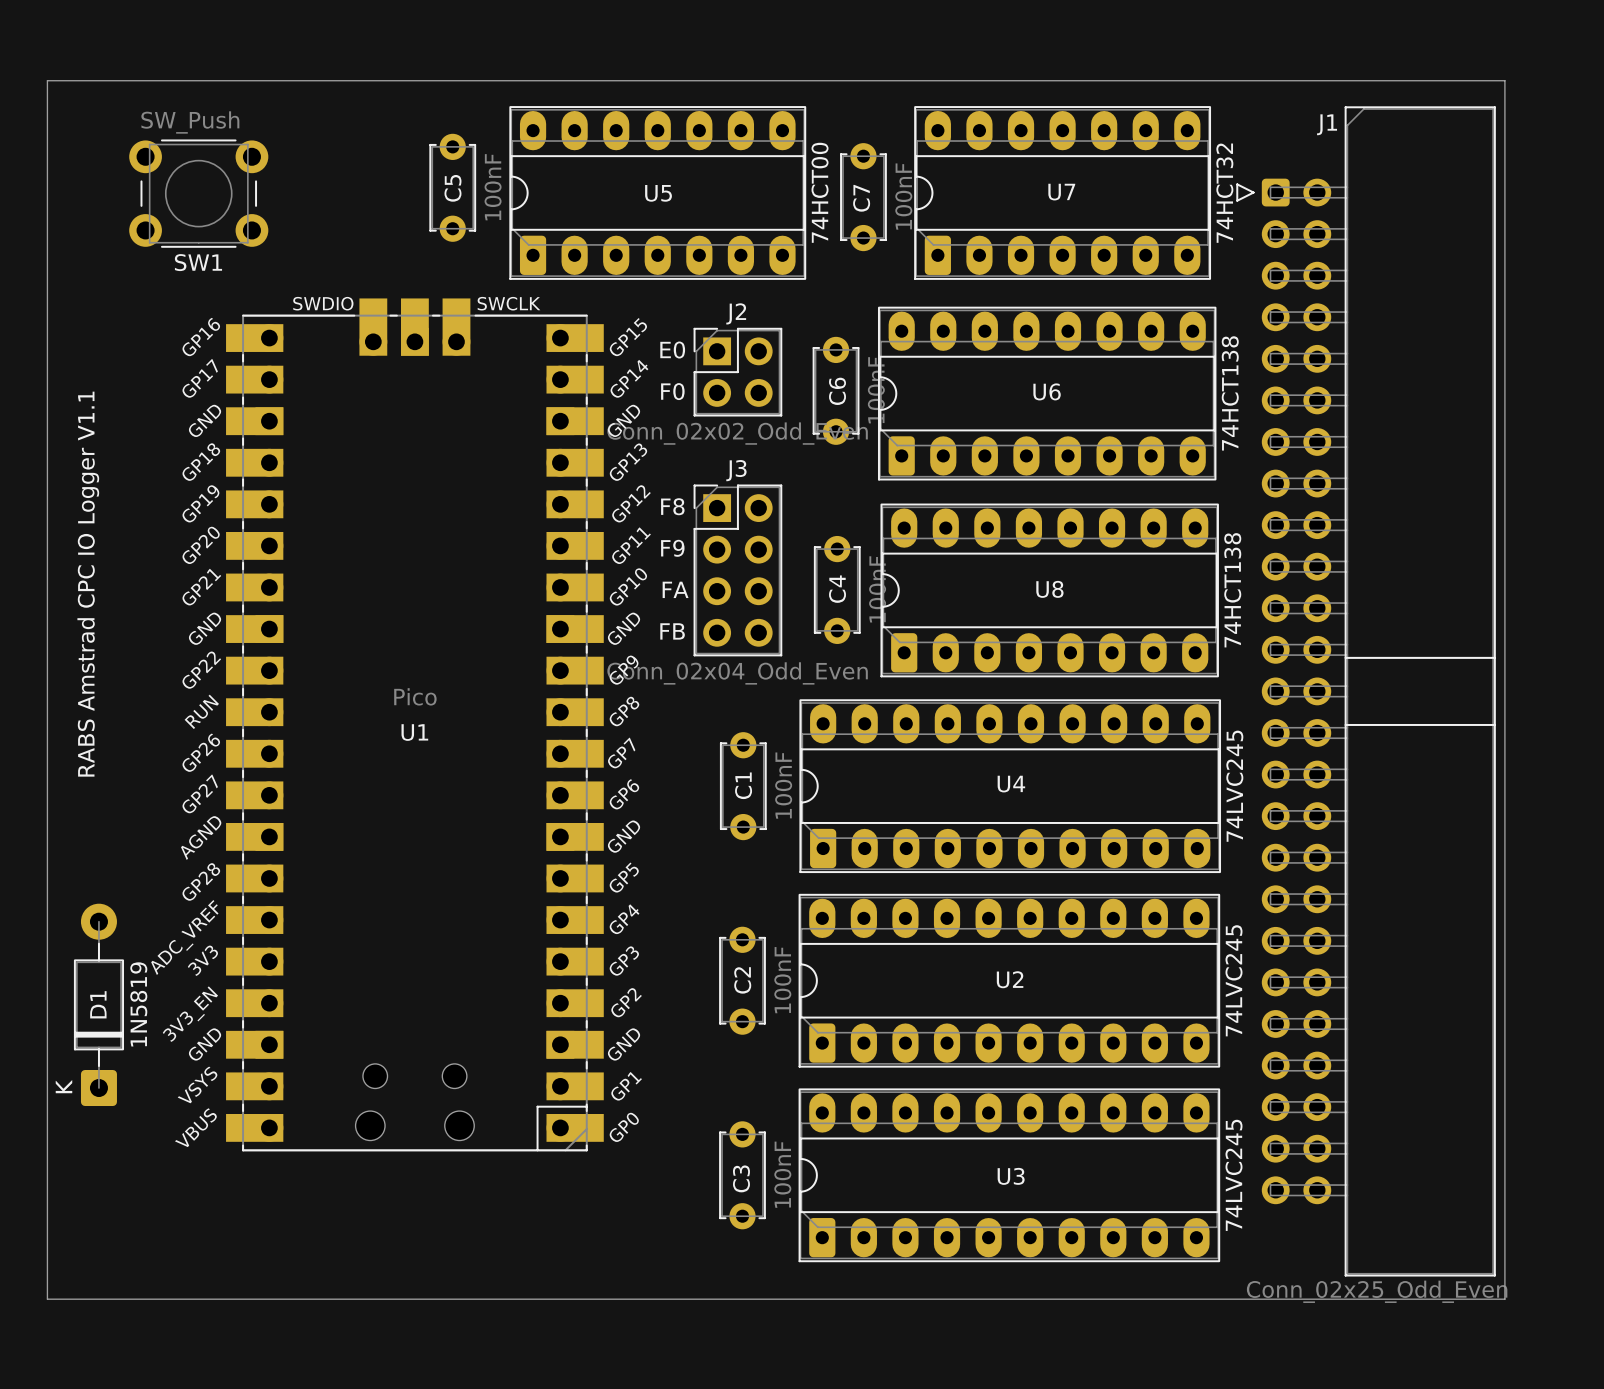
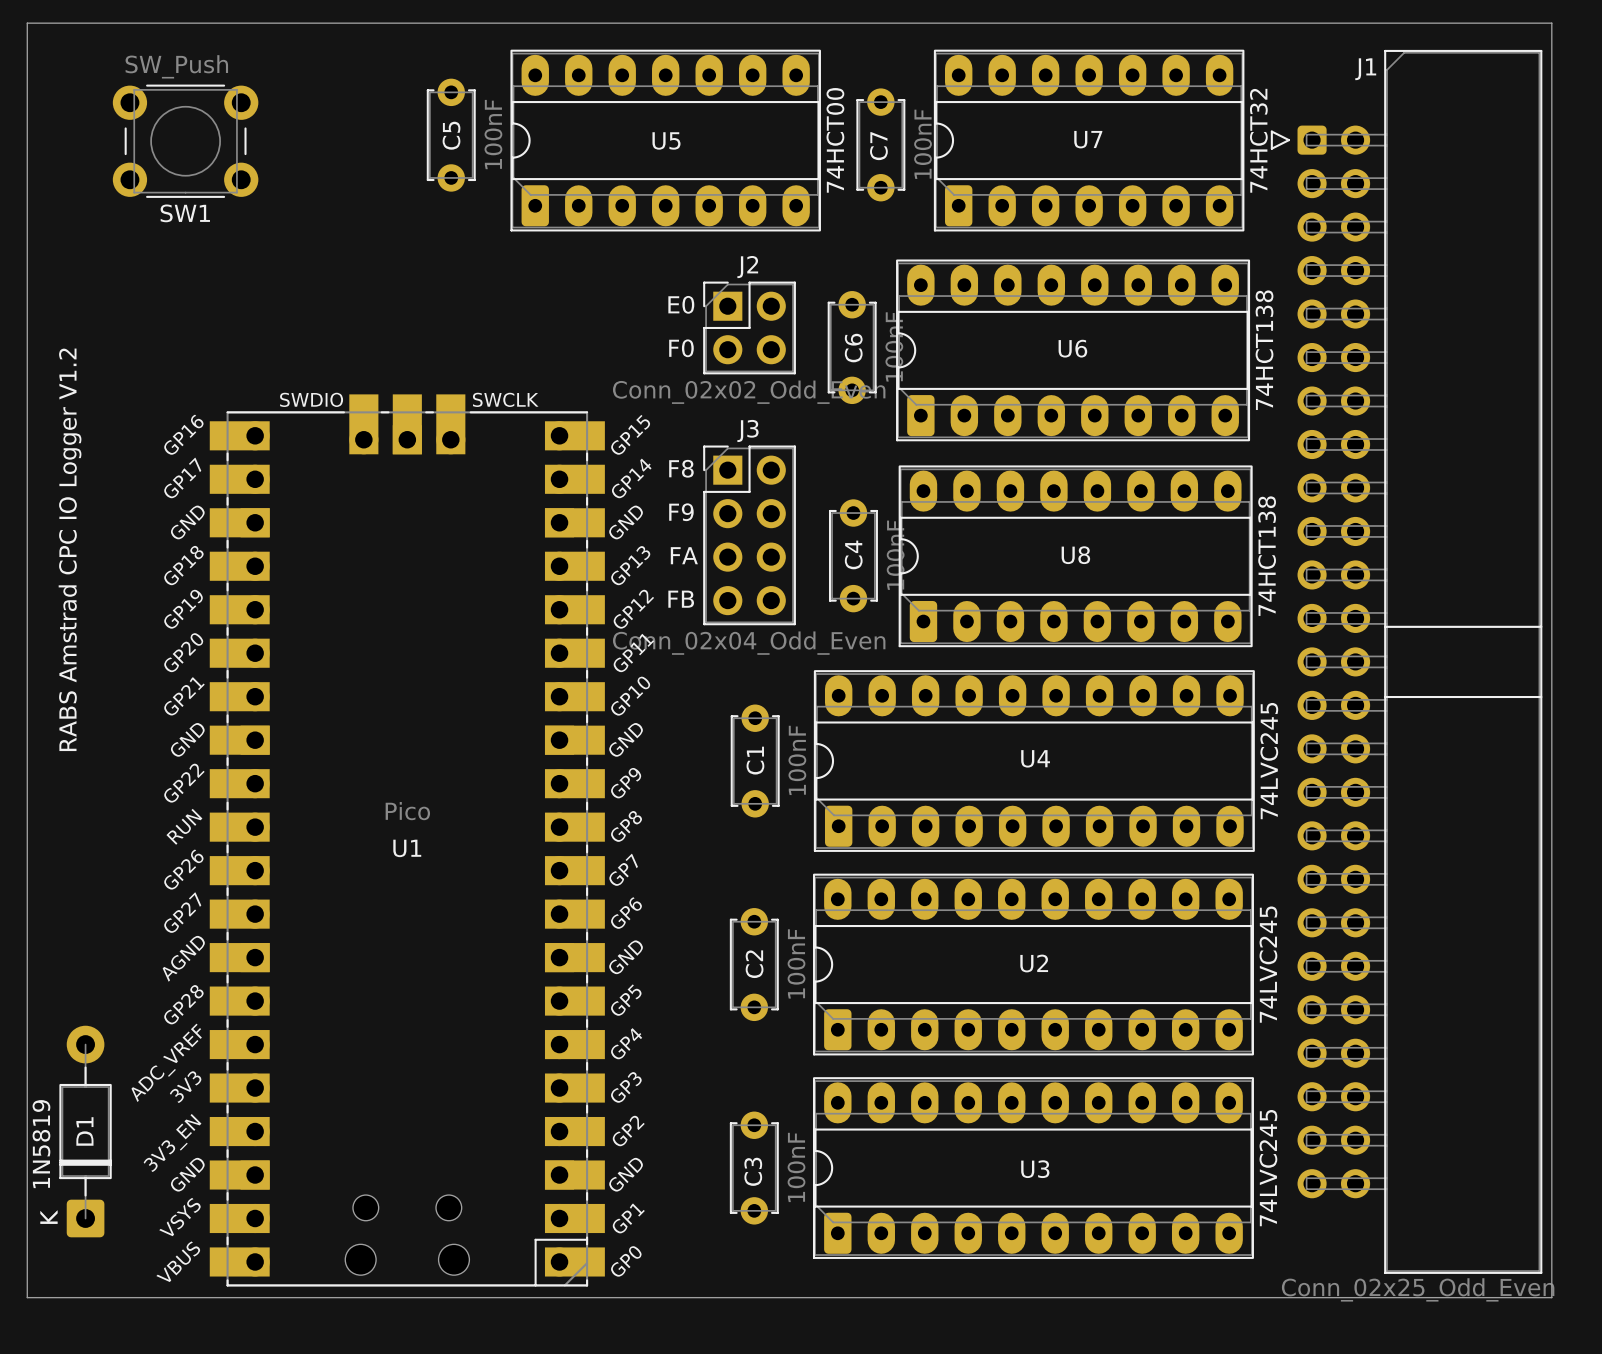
text: RABS Amstrad CPC IO Logger V1.1 (88, 584) -> RABS Amstrad CPC IO Logger V1.2 (70, 549)
U1 position: (414, 724) -> (407, 840)
D1 position: (98, 1004) -> (85, 1131)
D1 value position: 1N5819 (138, 1004) -> 1N5819 (41, 1144)

